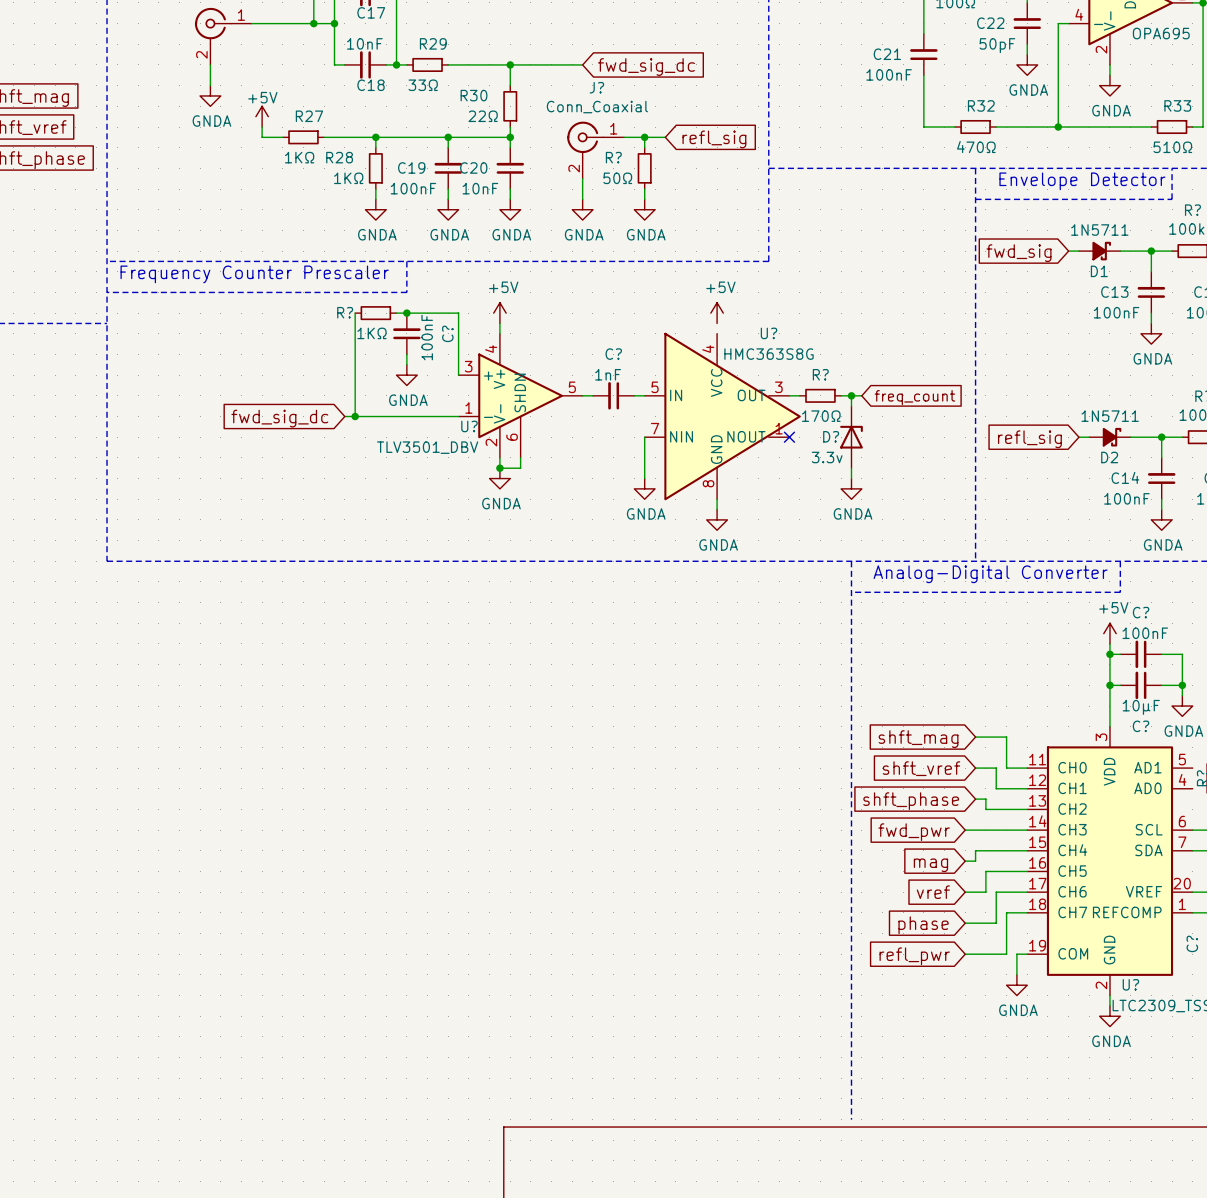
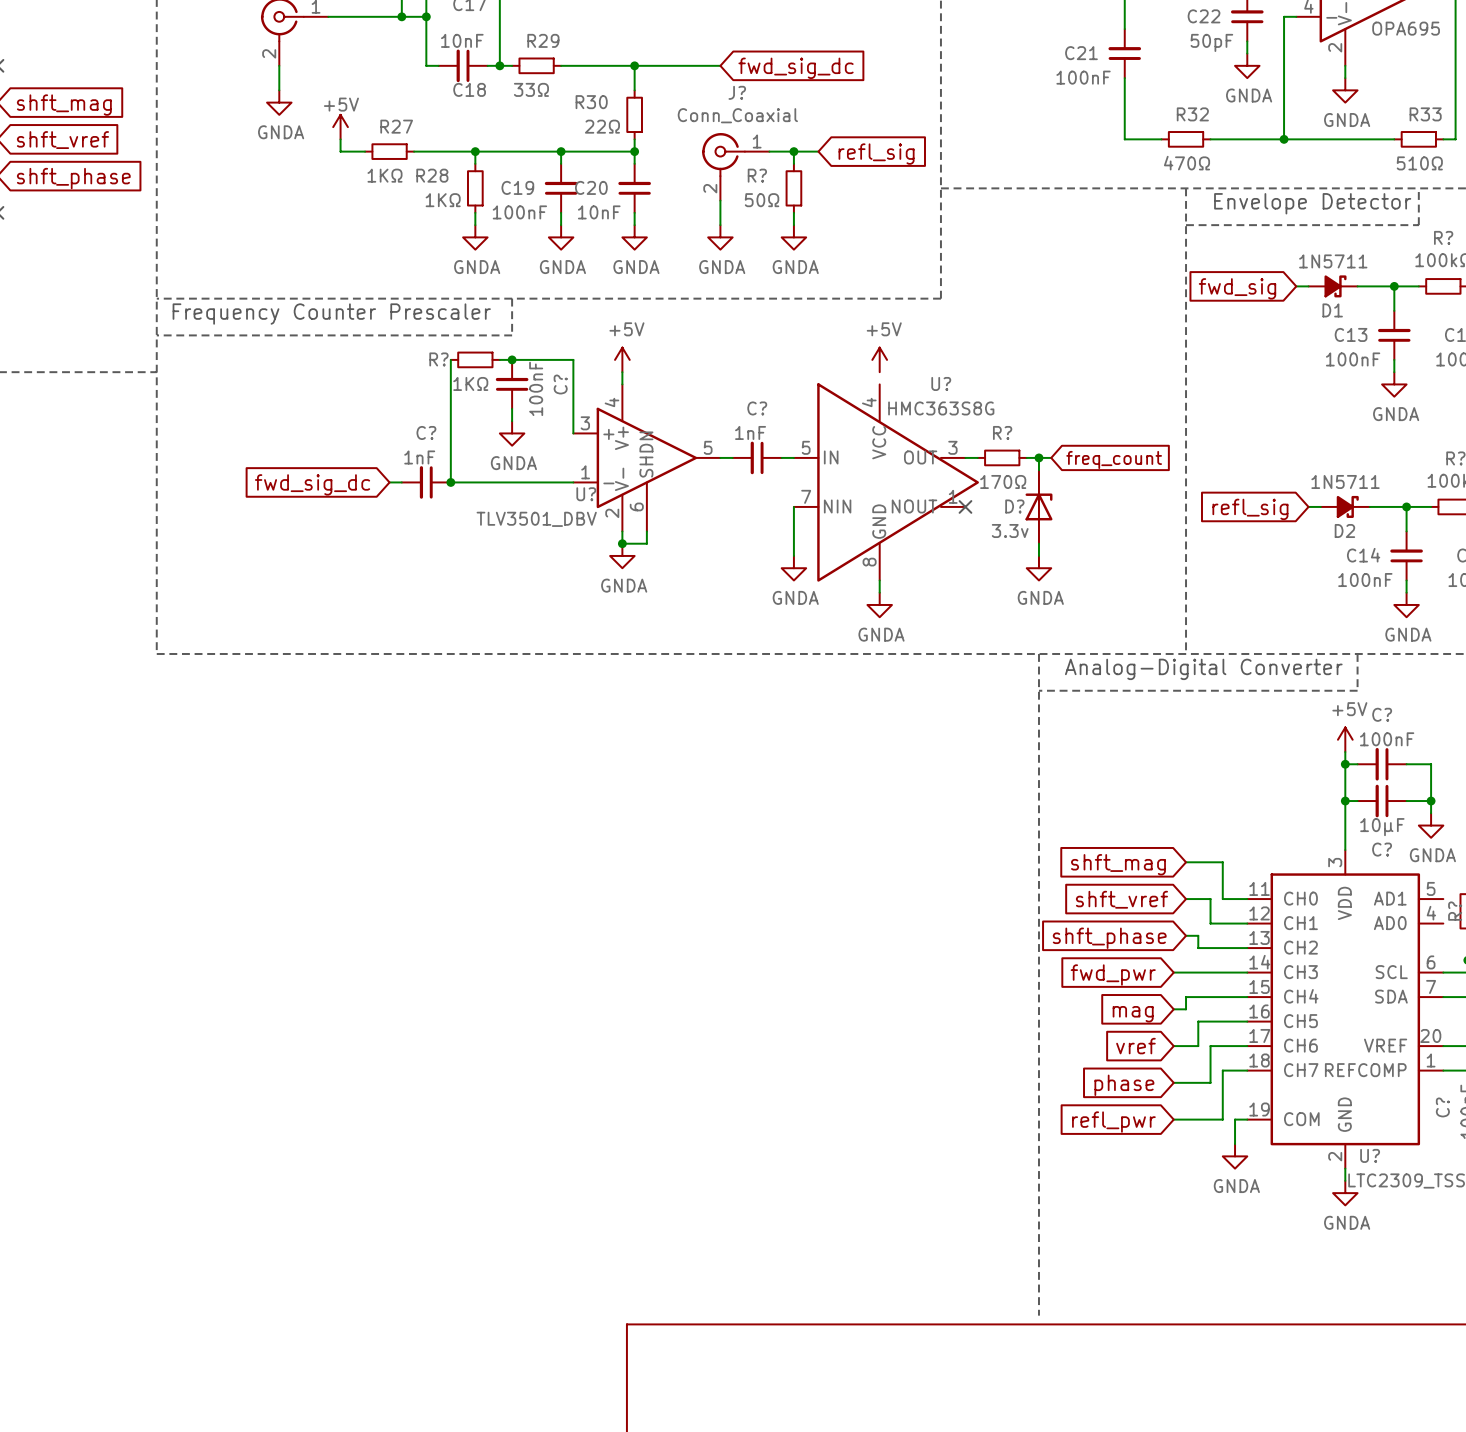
C?: none -> 1nF (426, 482)
global label position: fwd_sig_dc (279, 418) -> fwd_sig_dc (312, 484)

